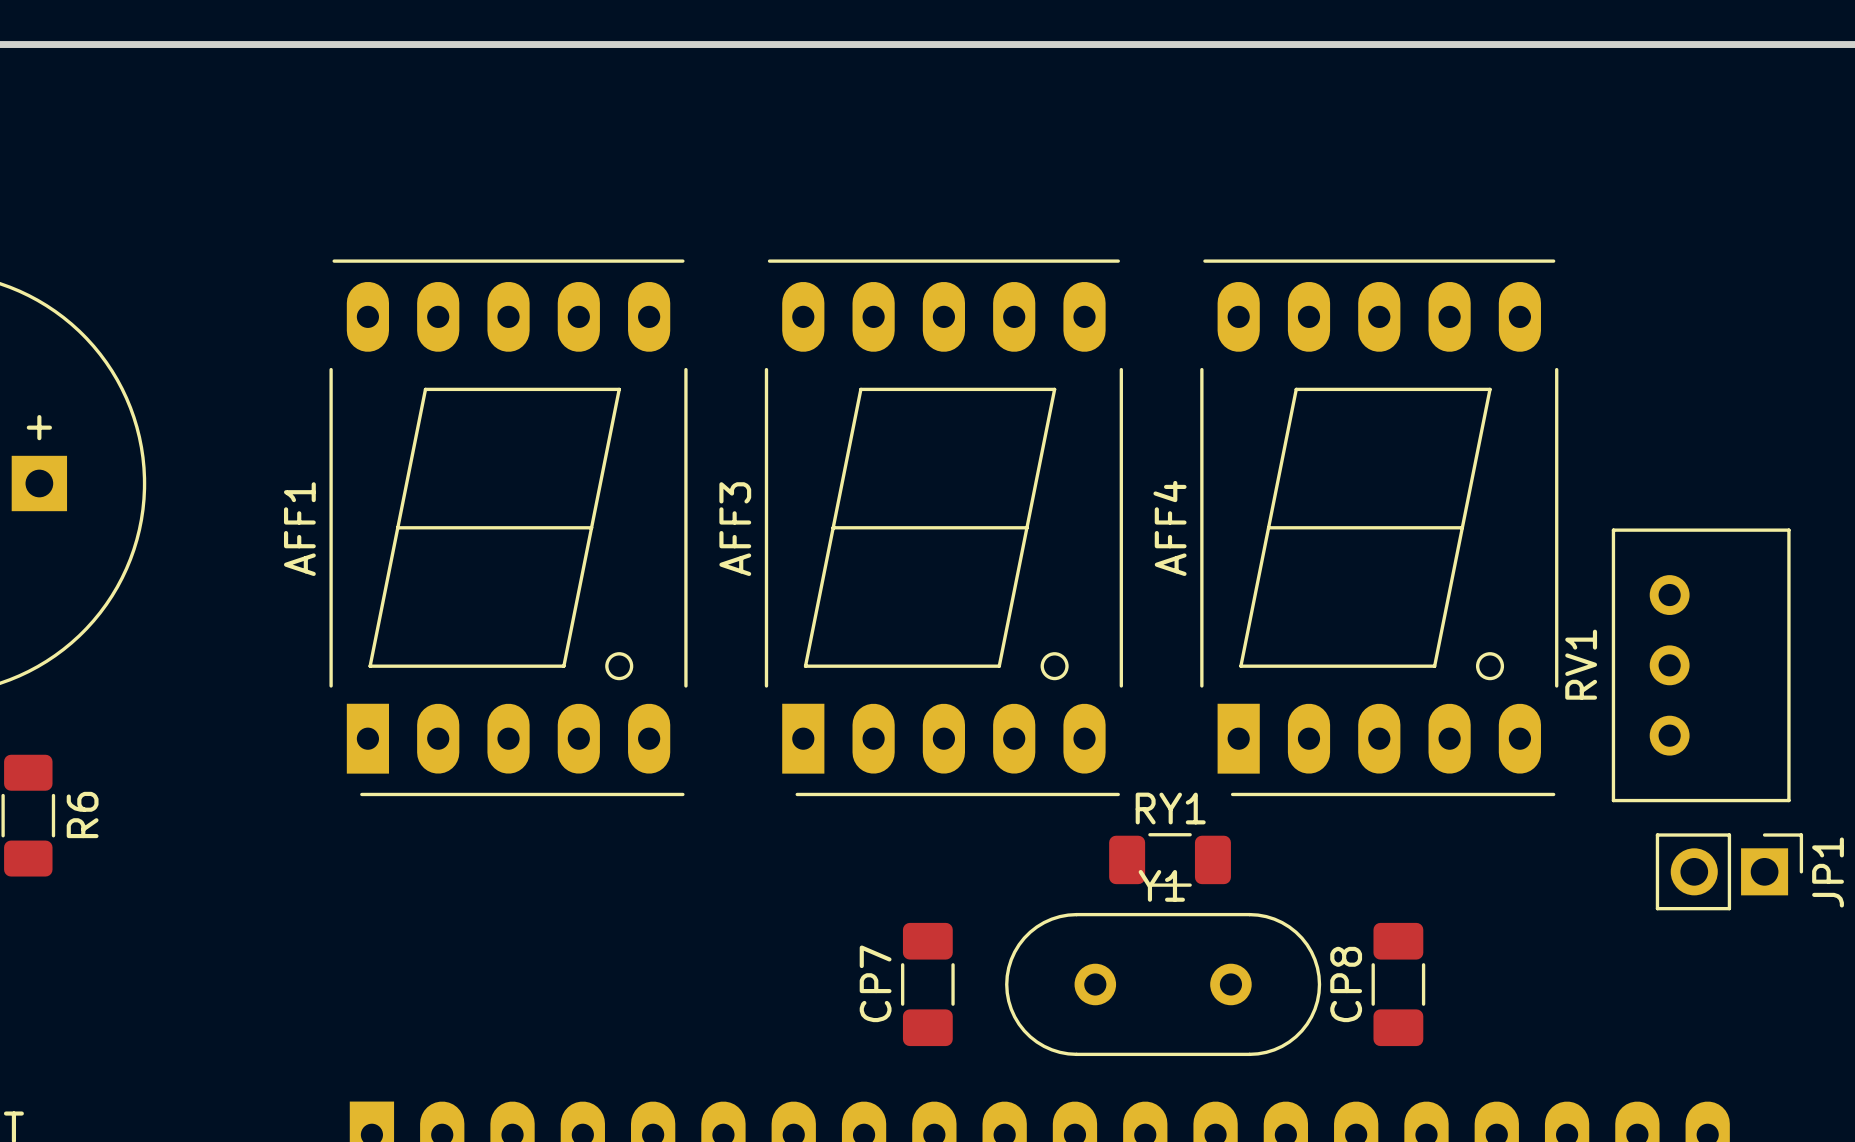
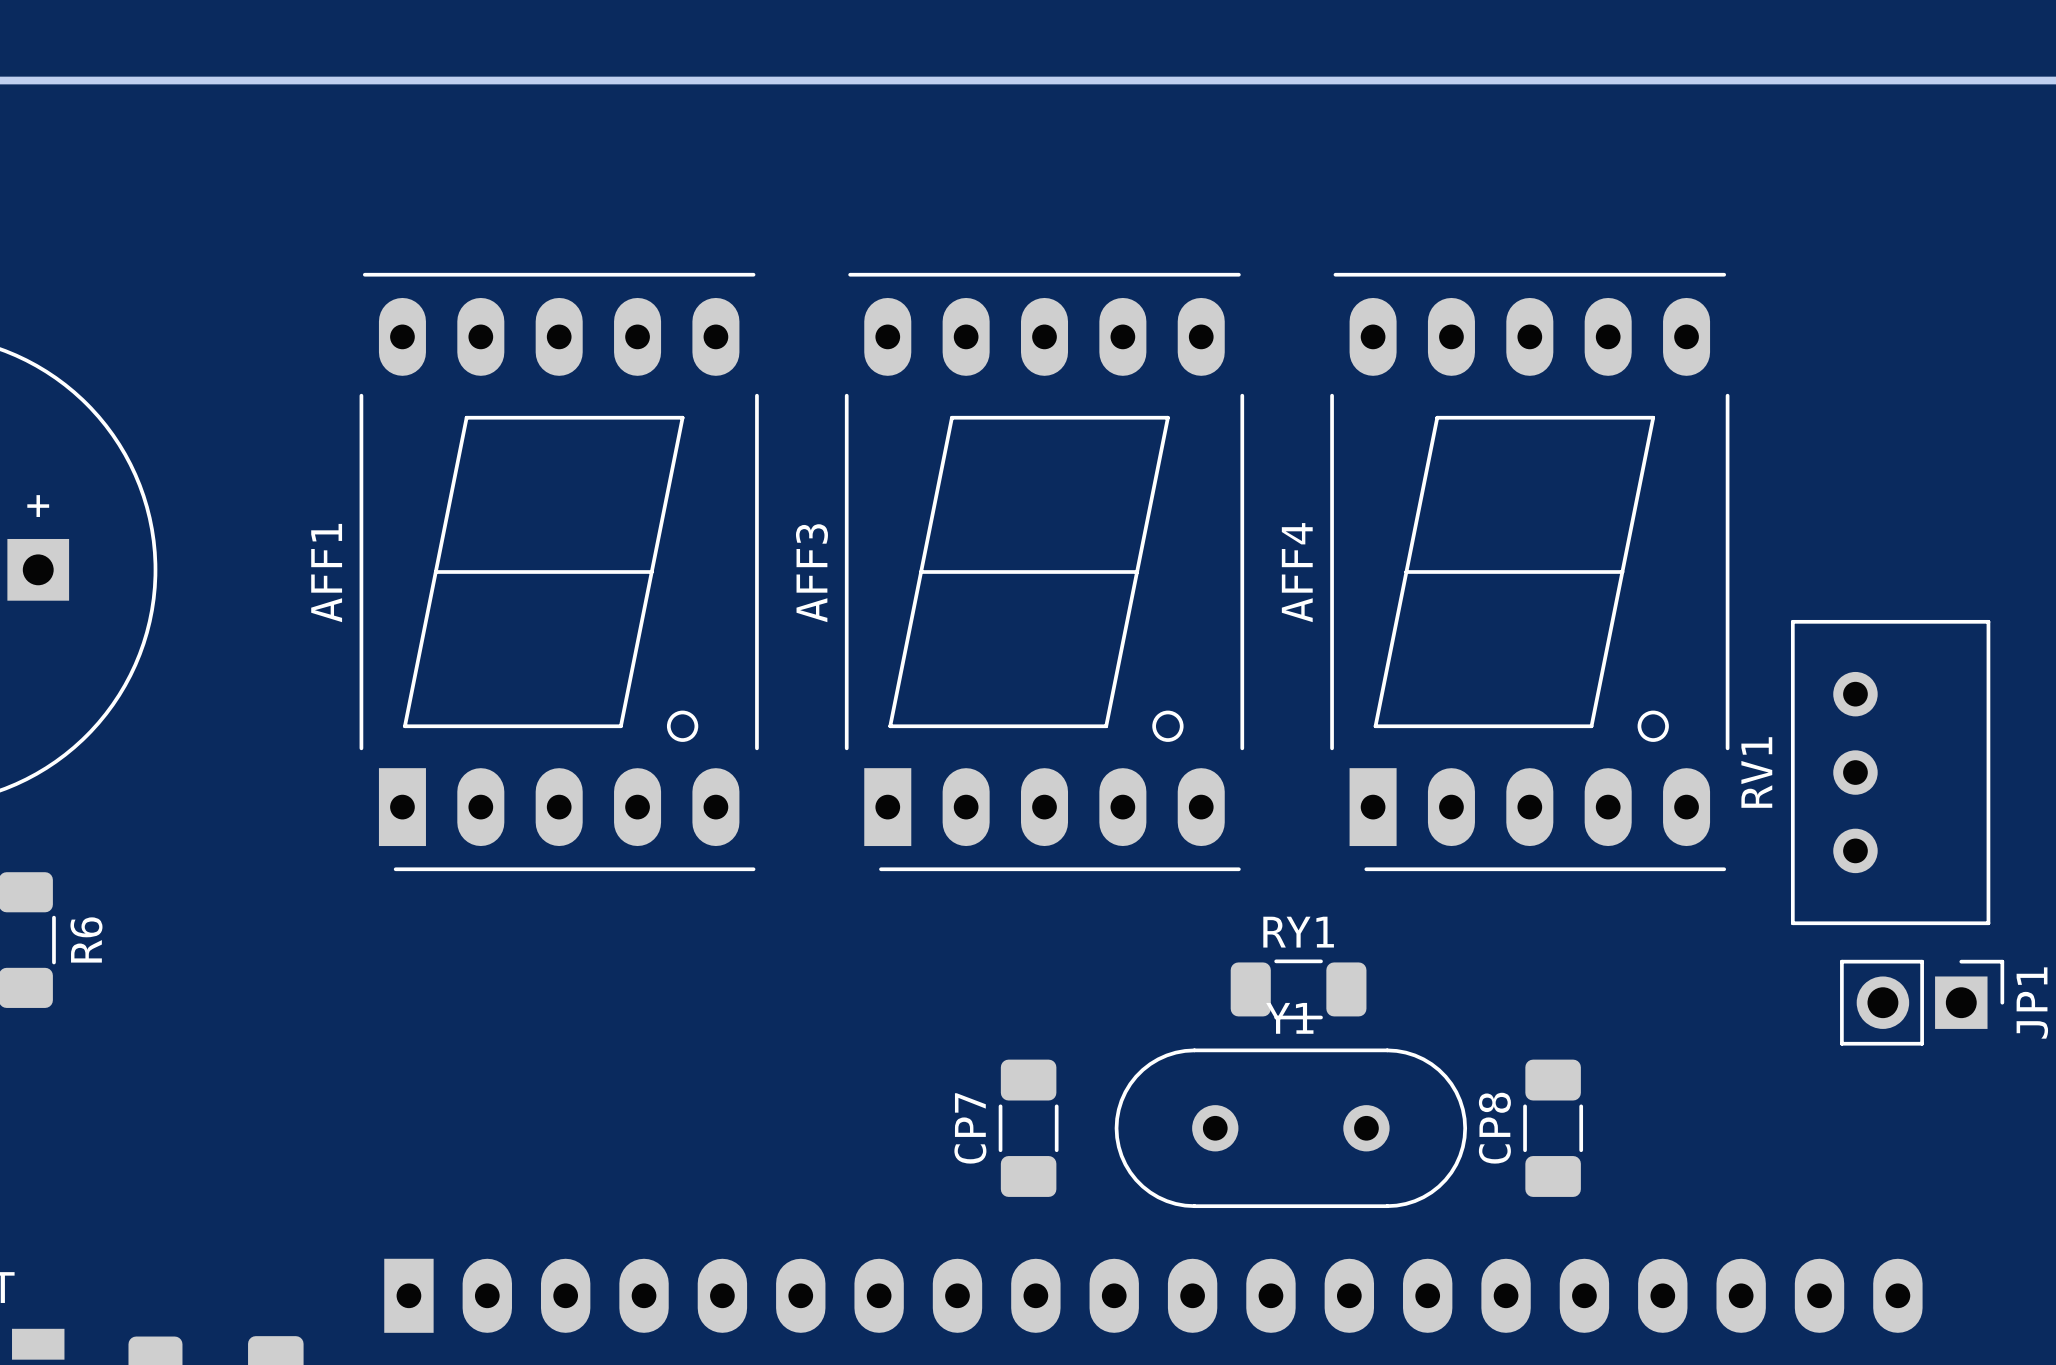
AFF1 position: (508, 527) -> (559, 571)
AFF3 position: (943, 527) -> (1044, 571)
AFF4 position: (1379, 527) -> (1529, 571)

